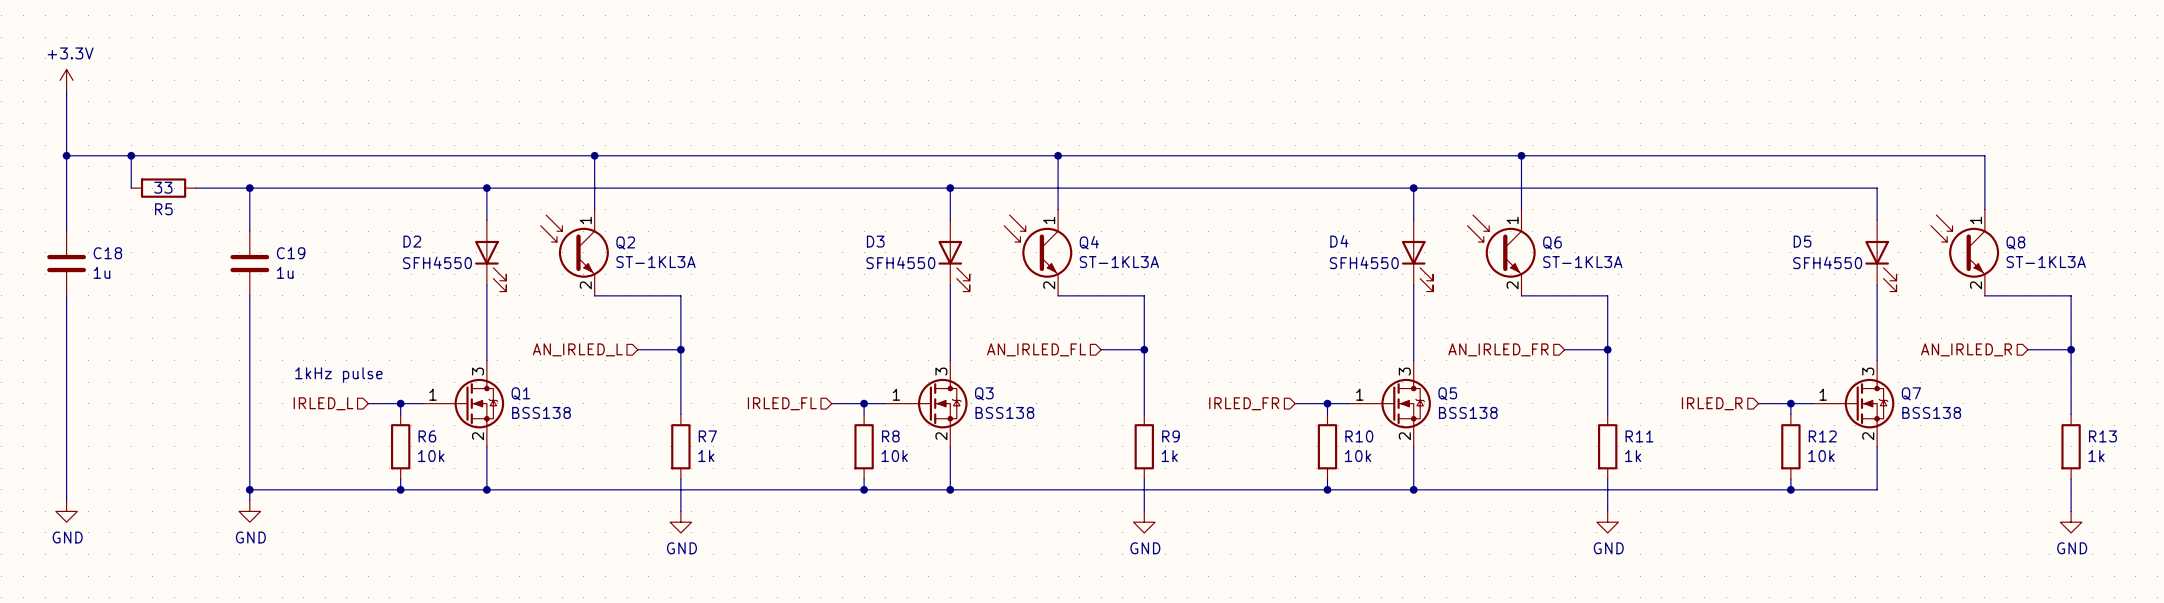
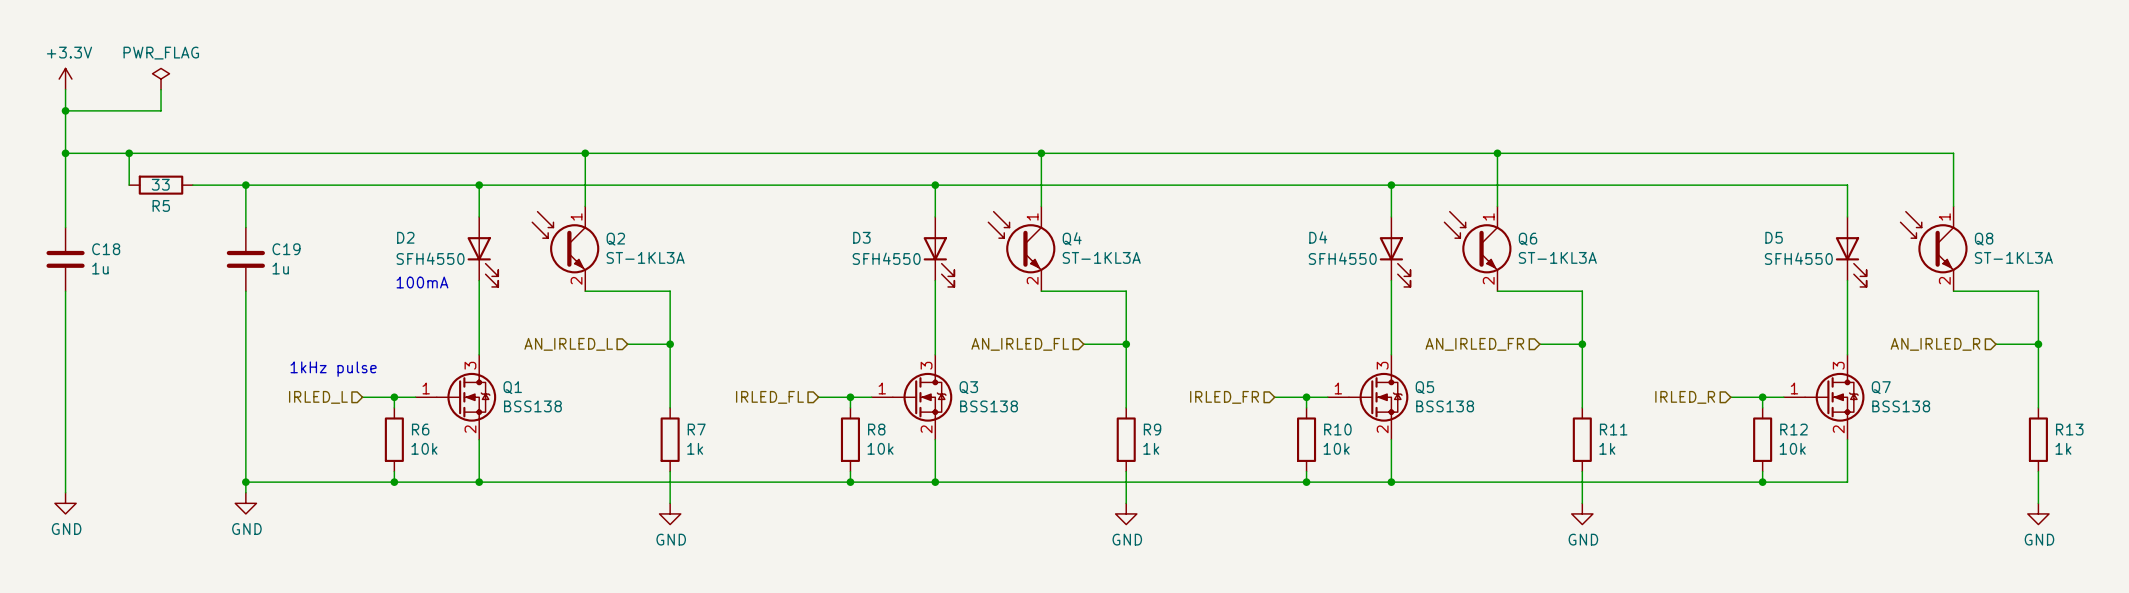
power symbol: none -> PWR_FLAG (161, 79)
wire: none -> (161, 89) (161, 110) (65, 110)
junction: none -> (65, 110)
text: none -> 100mA (422, 282)

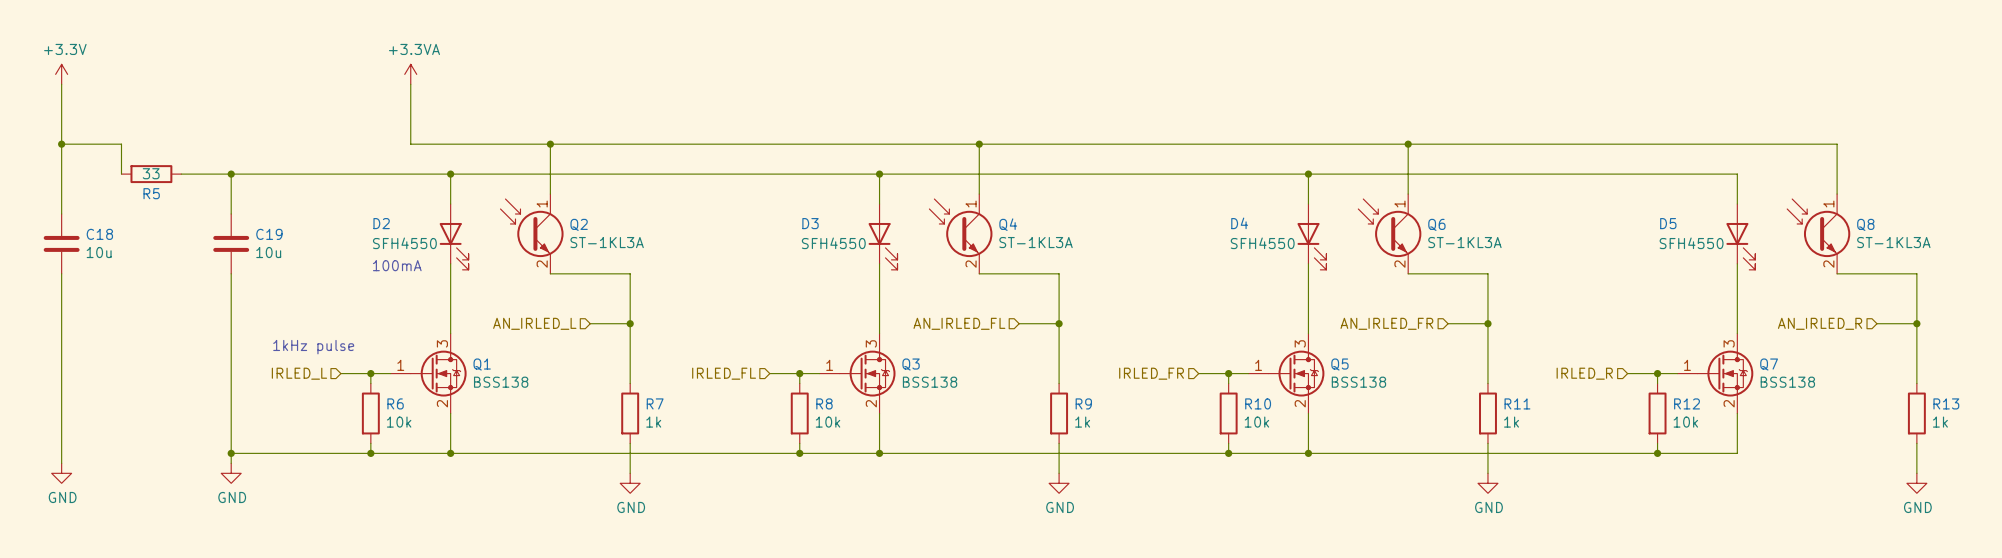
power symbol: PWR_FLAG (161, 79) -> none
power symbol: none -> +3.3VA (410, 74)
wire: (161, 89) (161, 110) (65, 110) -> none
junction: (65, 110) -> none
wire: (129, 153) (436, 153) -> (410, 84) (410, 144)
junction: (129, 153) -> none
C18 value: 1u (100, 268) -> 10u (99, 252)
C19 value: 1u (280, 268) -> 10u (268, 252)

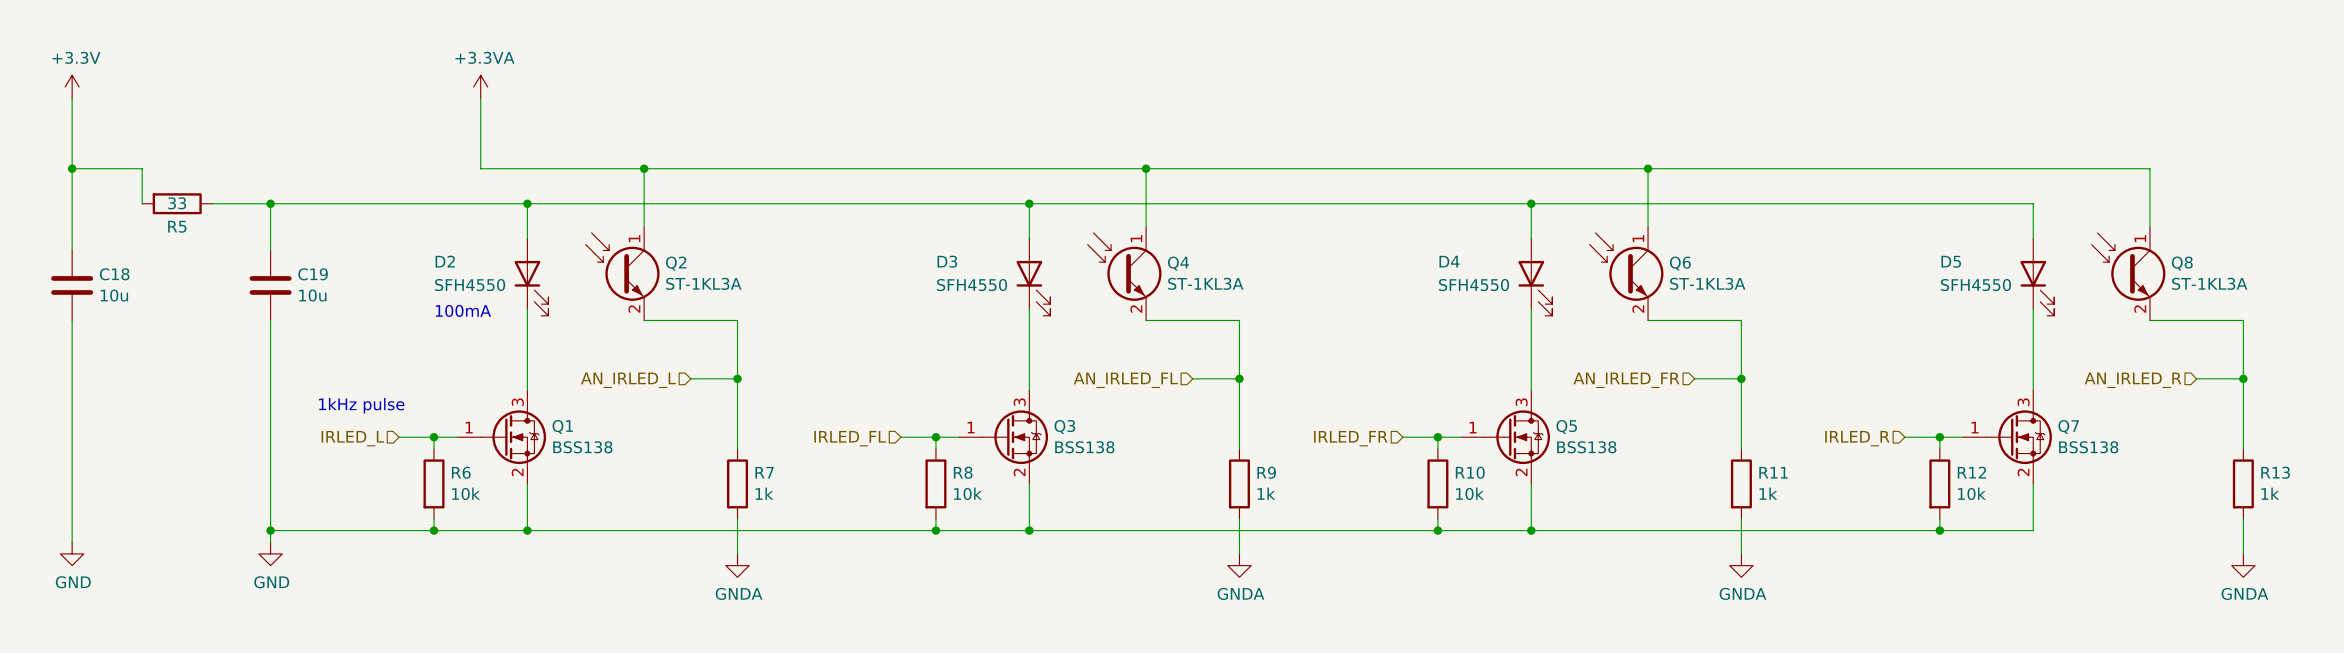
power symbol: GND (630, 483) -> GNDA (737, 565)
power symbol: GND (1059, 483) -> GNDA (1239, 565)
power symbol: GND (1487, 483) -> GNDA (1741, 565)
power symbol: GND (1916, 483) -> GNDA (2243, 565)

